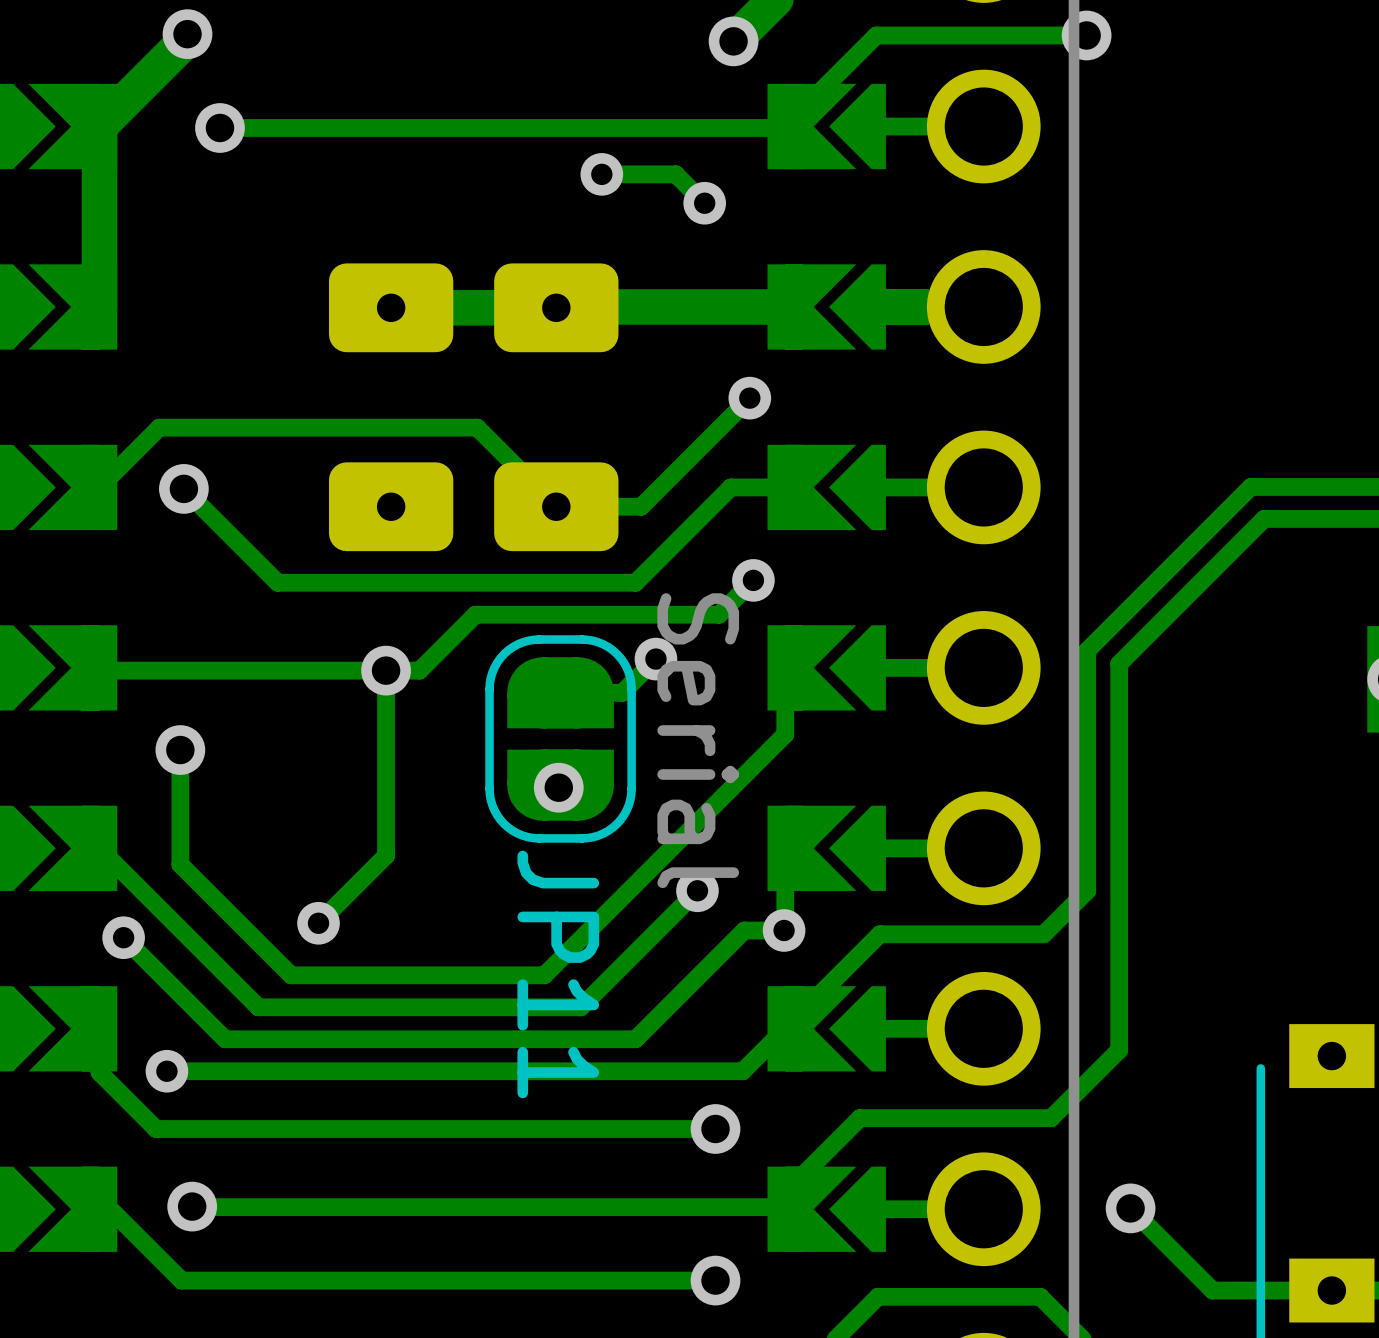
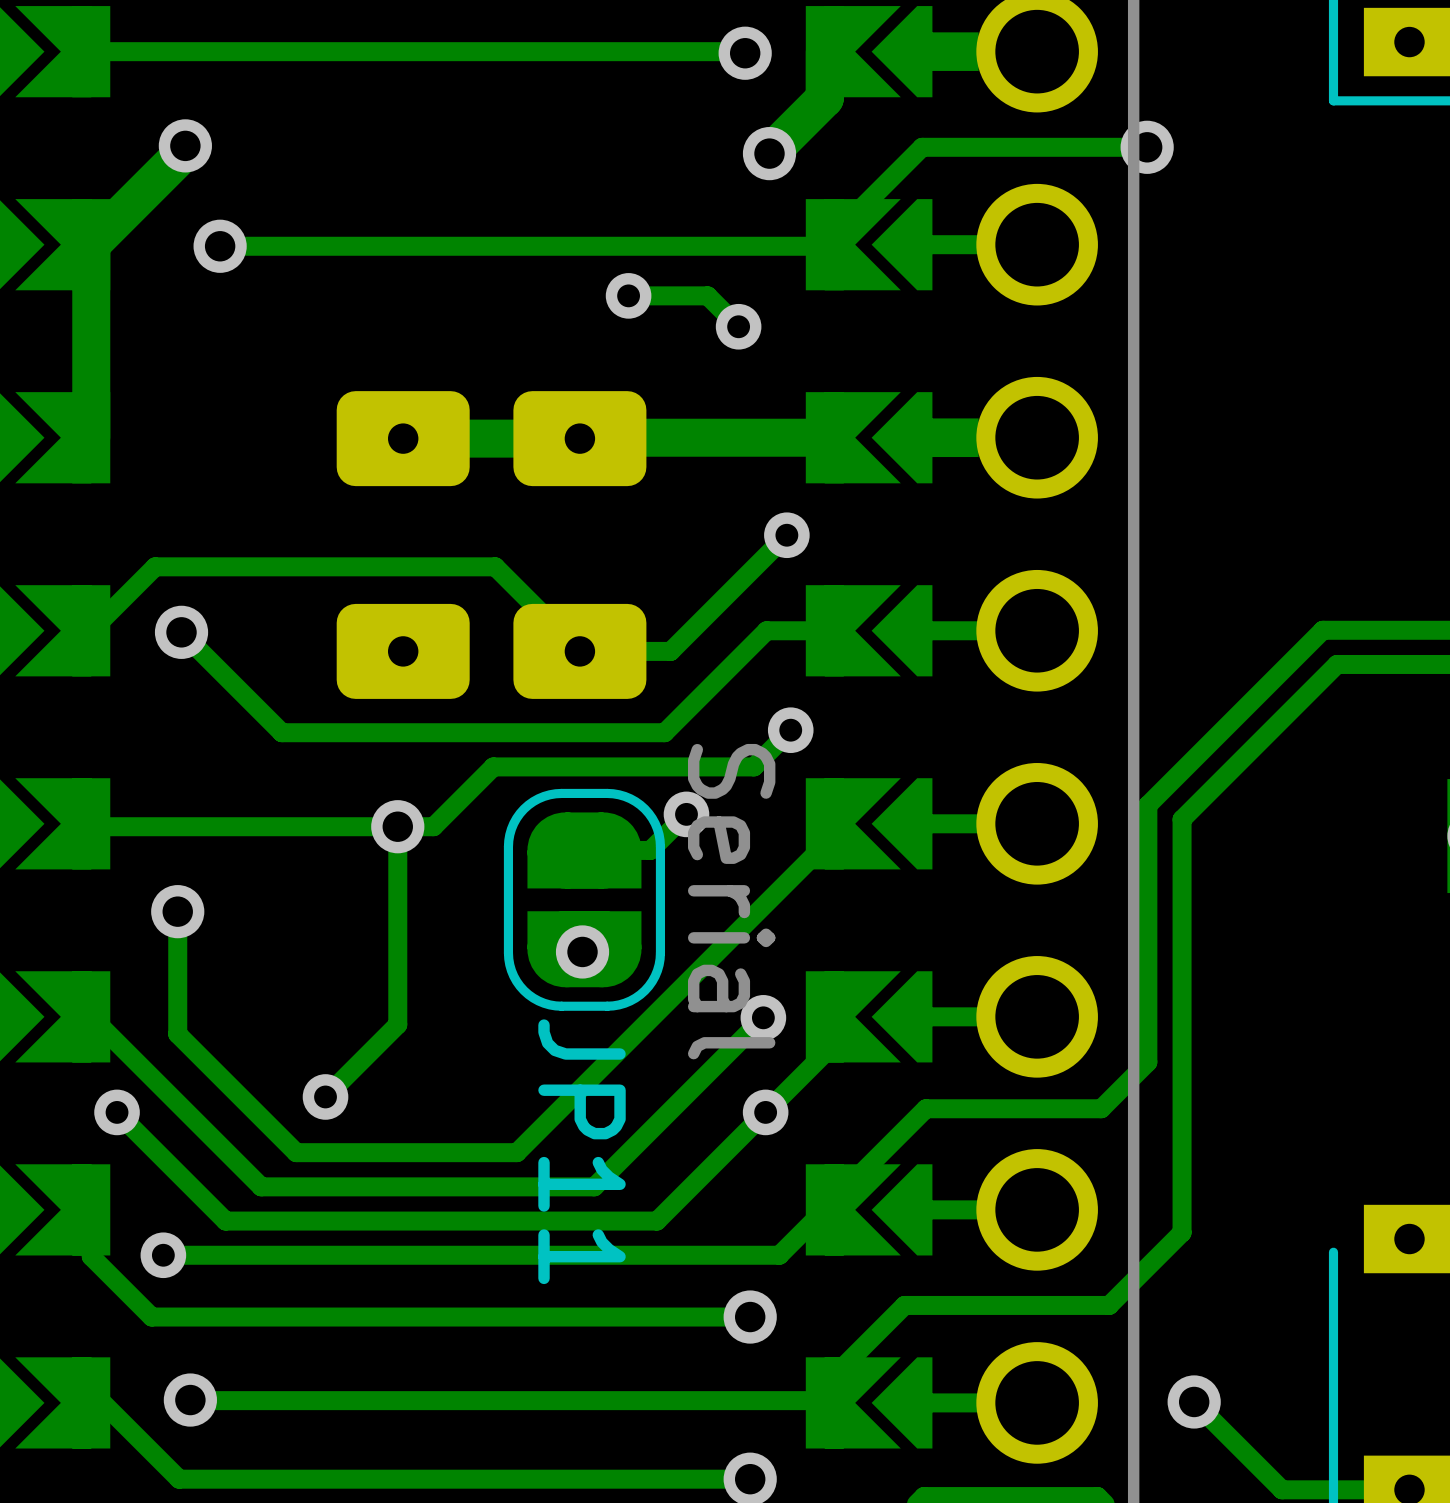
track: (785, 687) (785, 734) (544, 975) (497, 975) -> (824, 844) (516, 1152)
track: (785, 882) (784, 930) (744, 930) (635, 1039) (628, 1039) -> (824, 1053) (656, 1221)
track: (697, 890) (580, 1007) (569, 1007) -> (763, 1017) (594, 1186)
via position: (697, 890) -> (763, 1017)
via: (784, 930) -> none
via: none -> (765, 1112)

